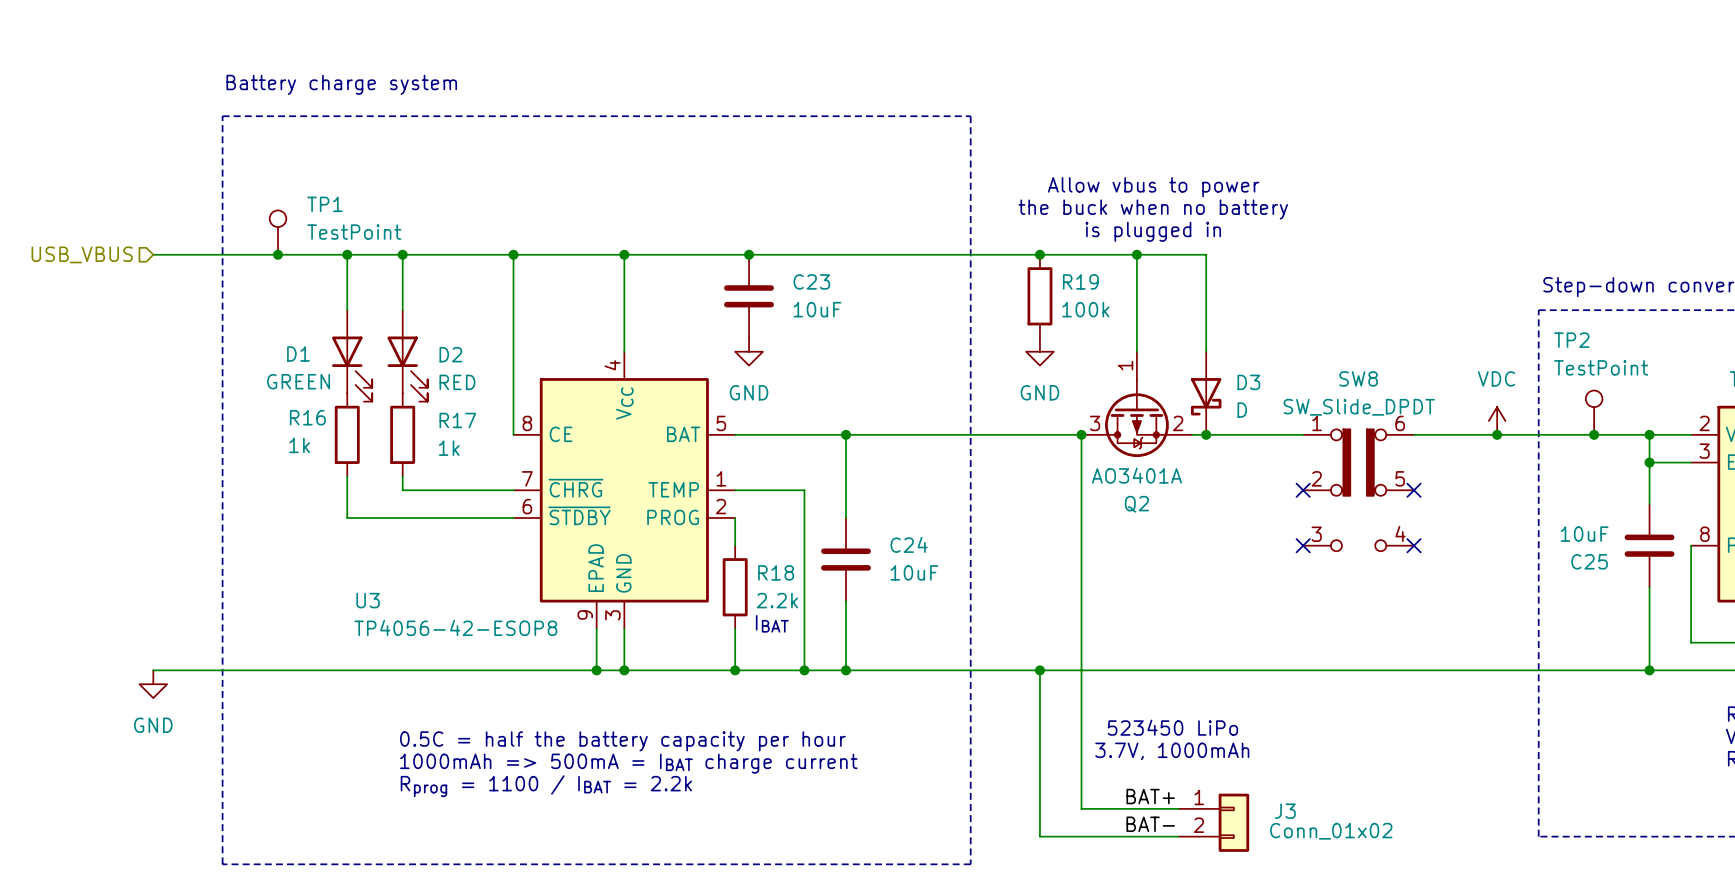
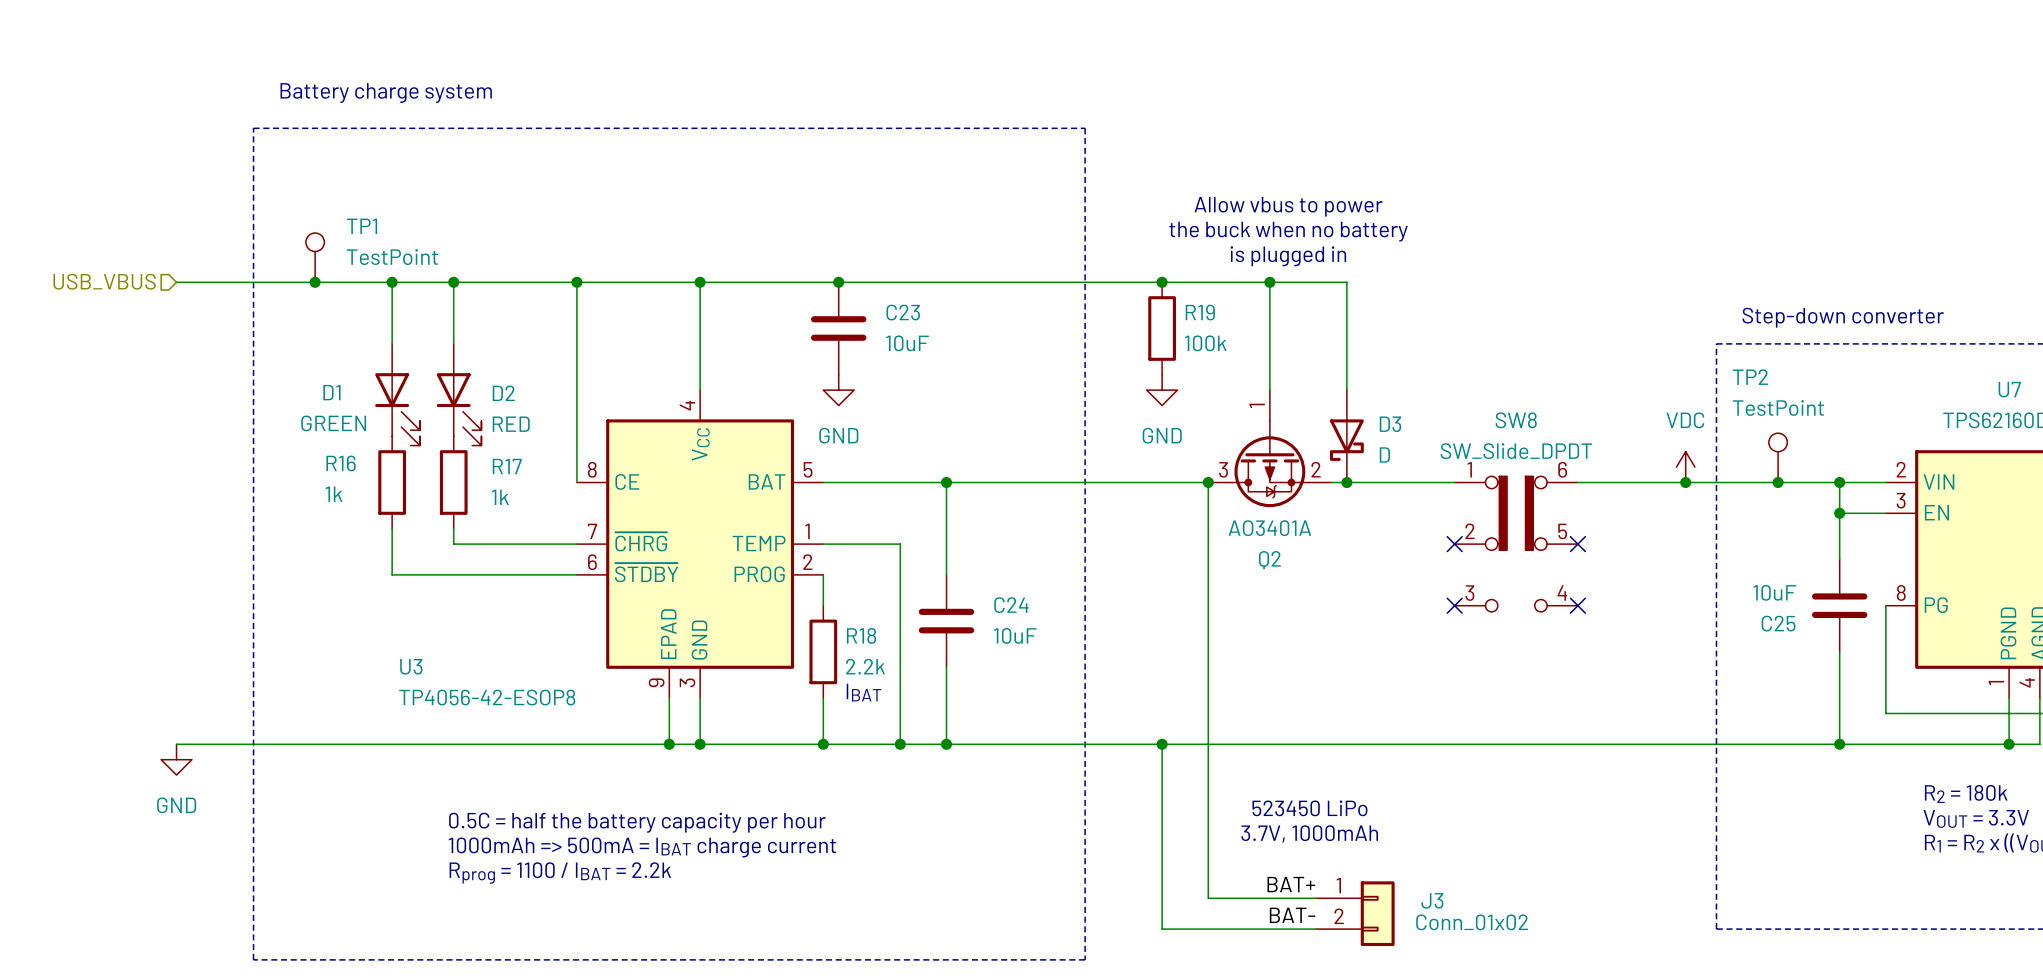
power symbol position: VDC (1497, 421) -> VDC (1685, 467)
junction position: (1497, 434) -> (1685, 482)

